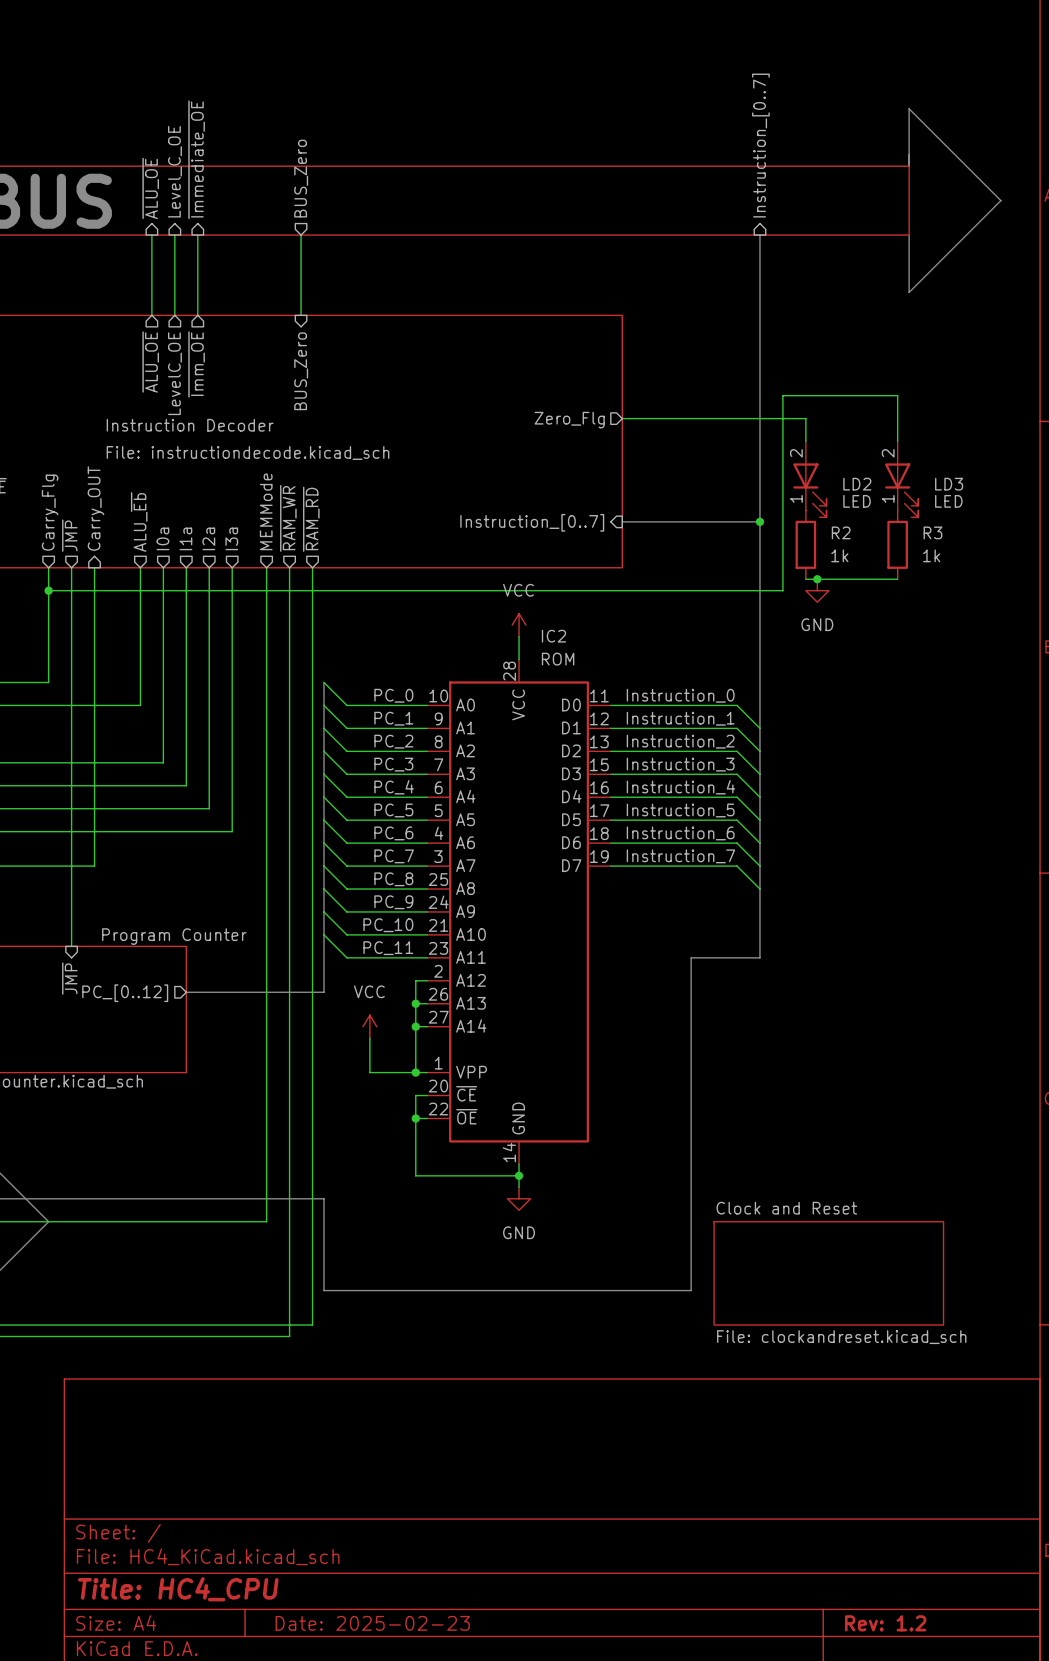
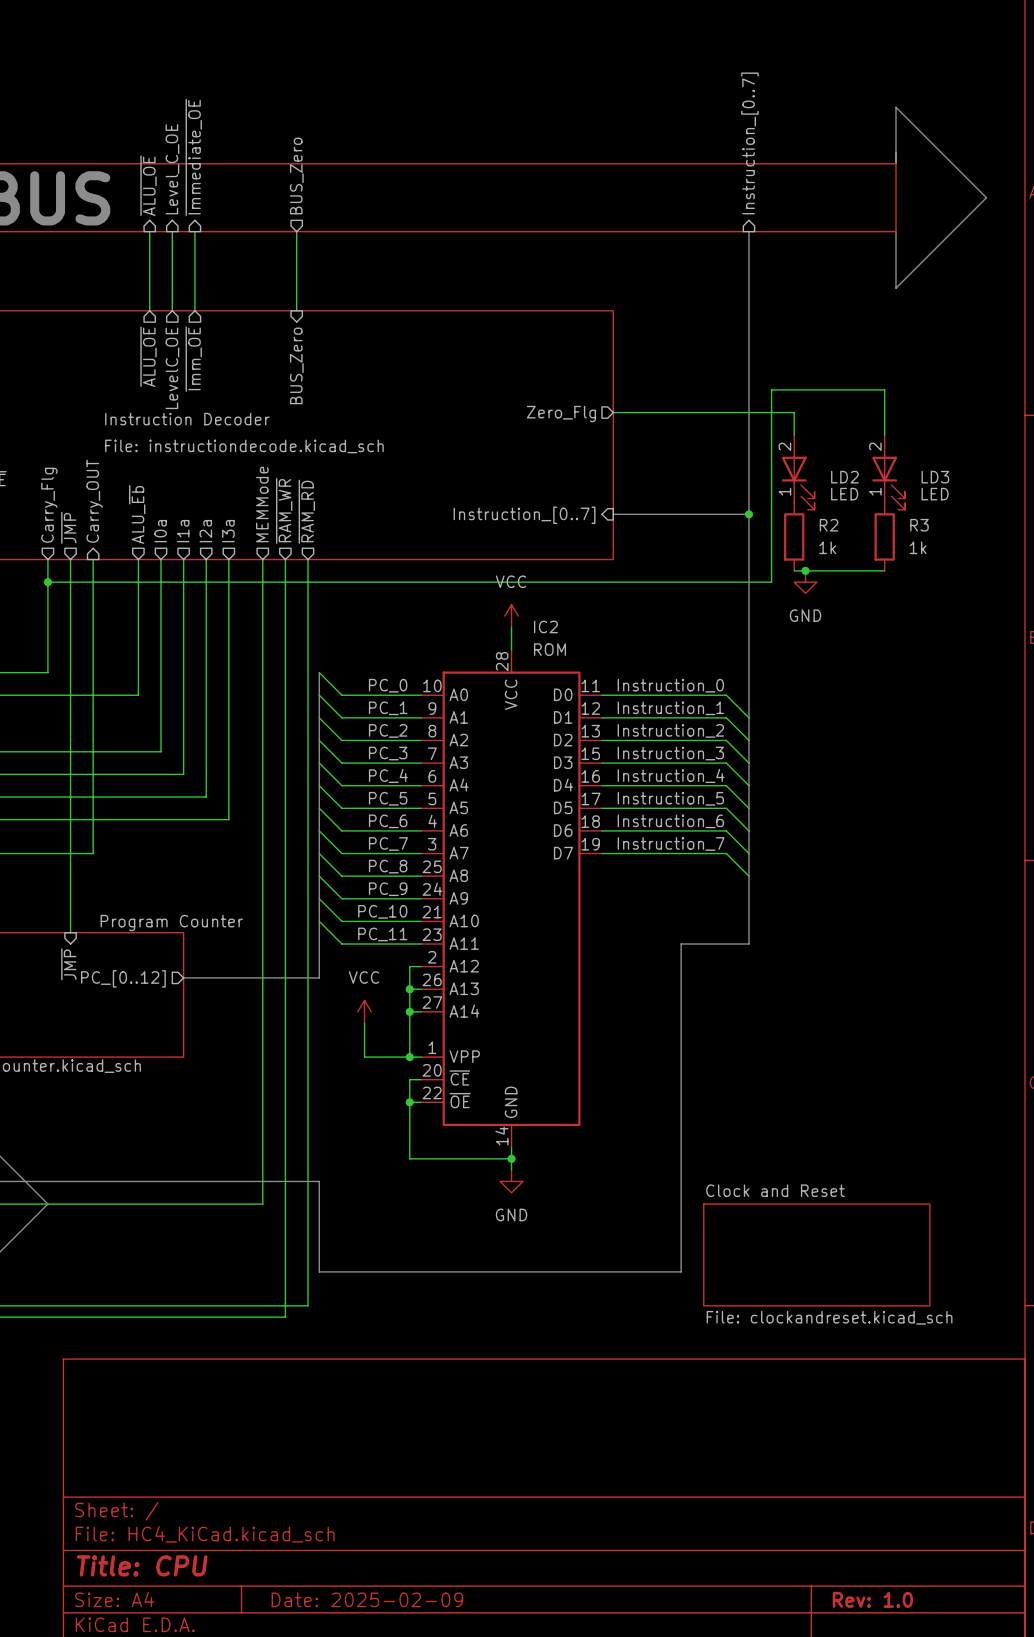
title block: Title: HC4_CPU (178, 1589) -> Title: CPU (142, 1565)
title block: Date: 2025-02-23 (372, 1623) -> Date: 2025-02-09 (367, 1599)
title block: Rev: 1.2 (885, 1623) -> Rev: 1.0 (872, 1599)

